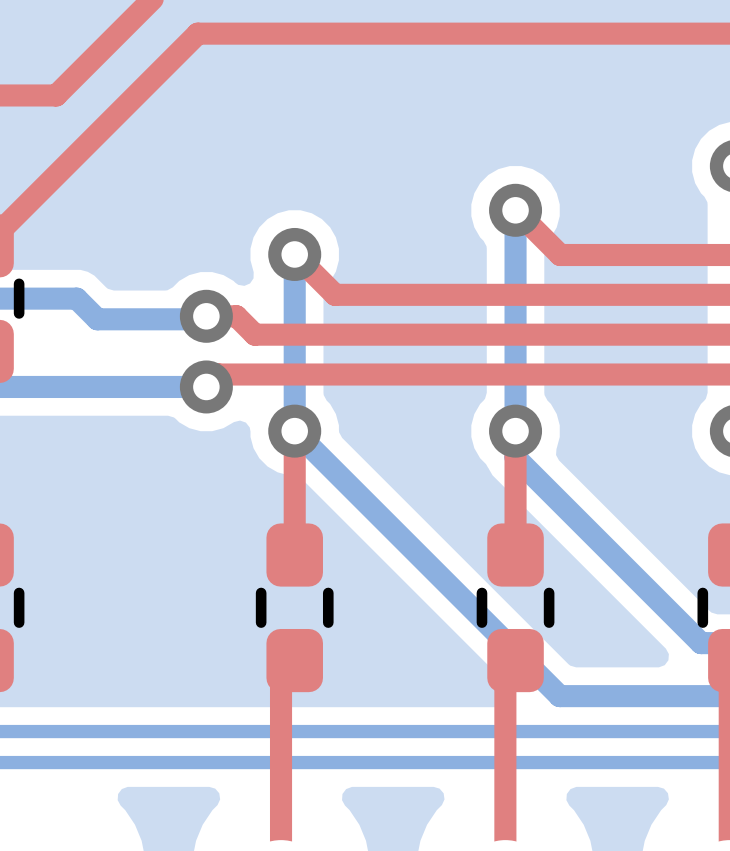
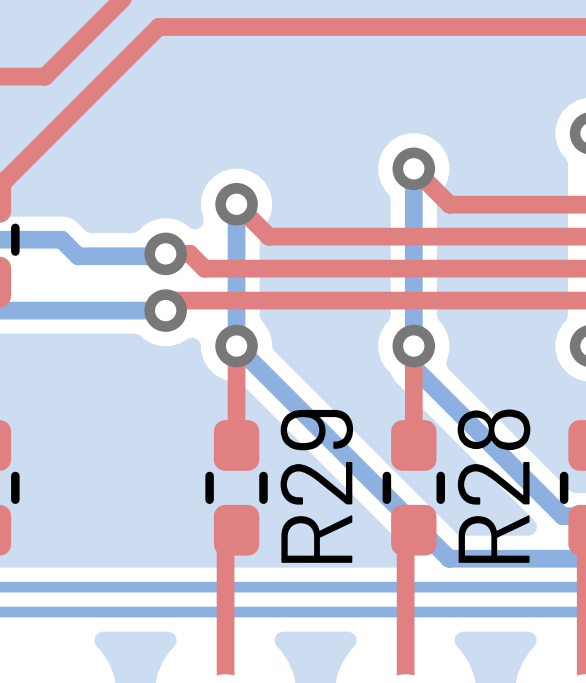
R29 name: none -> R29 (316, 486)
R28 name: none -> R28 (494, 486)

